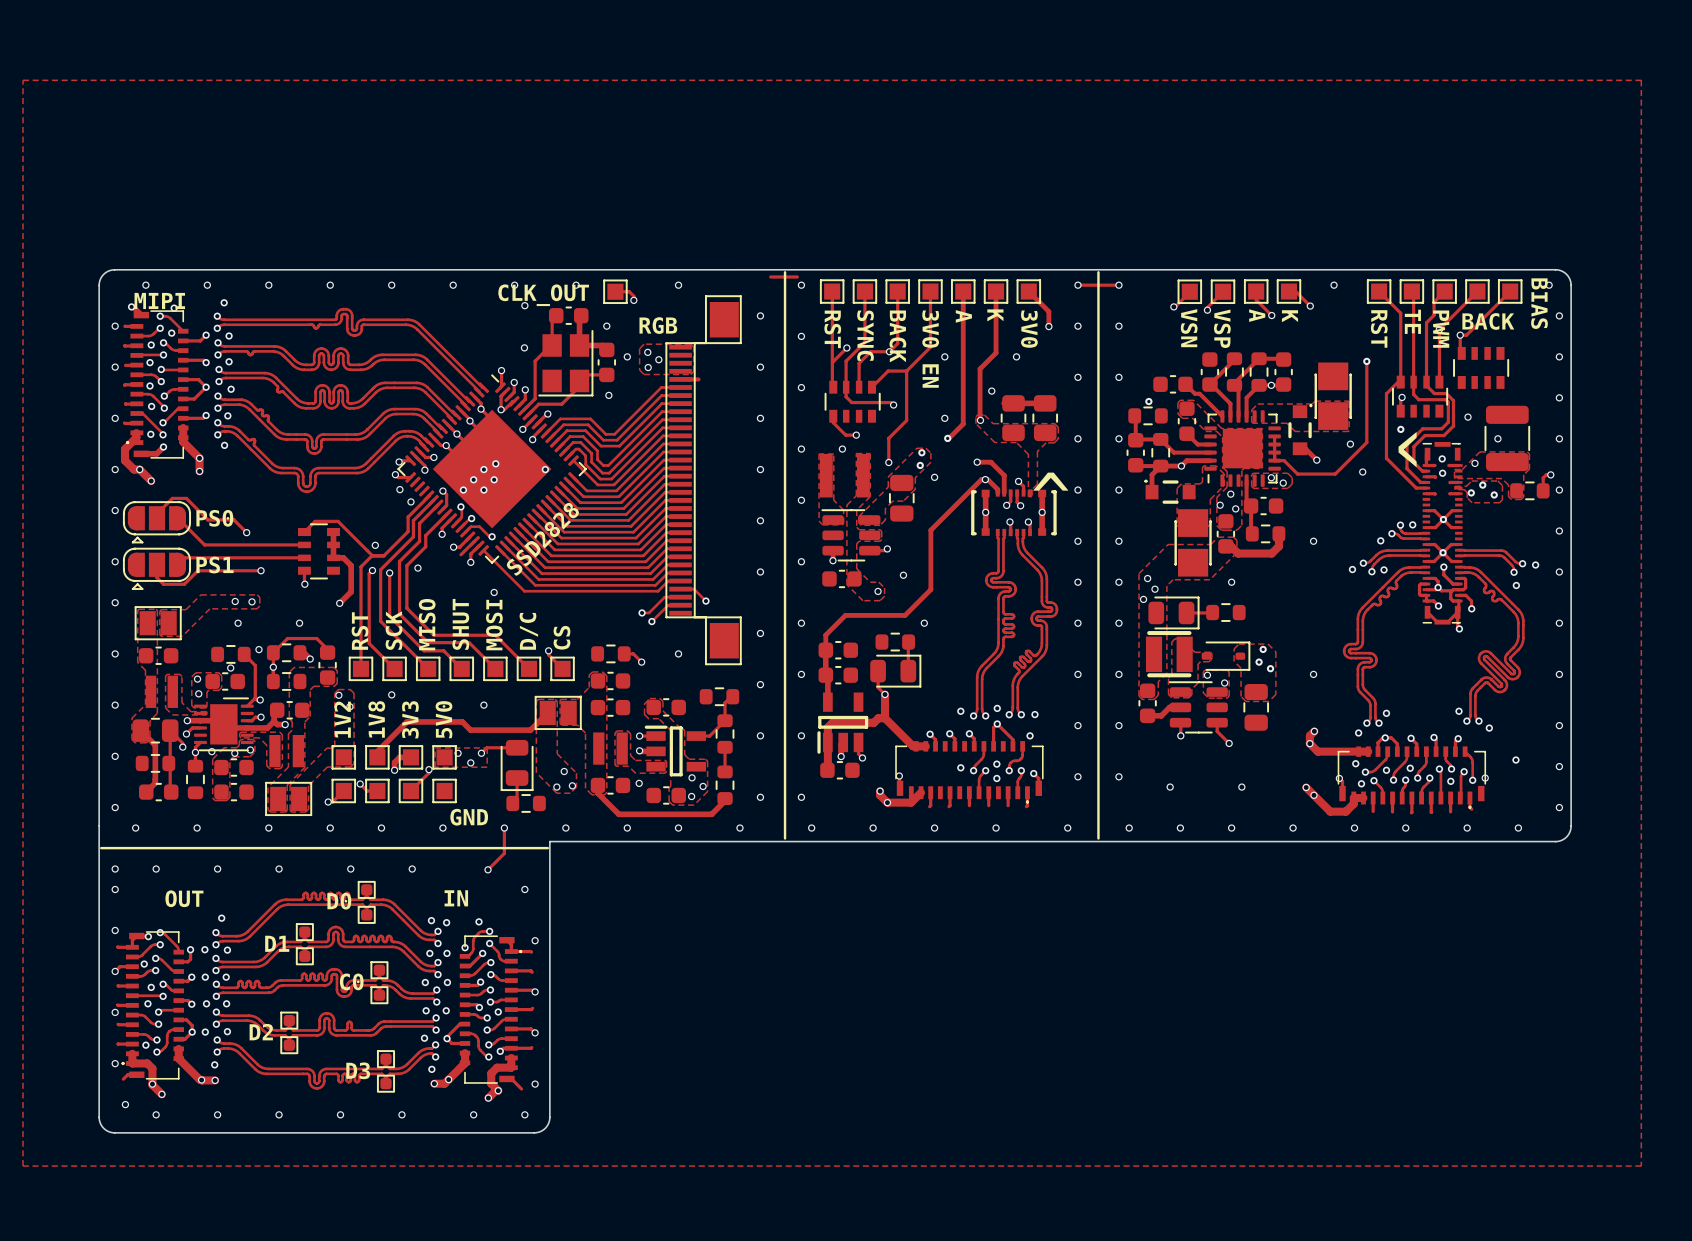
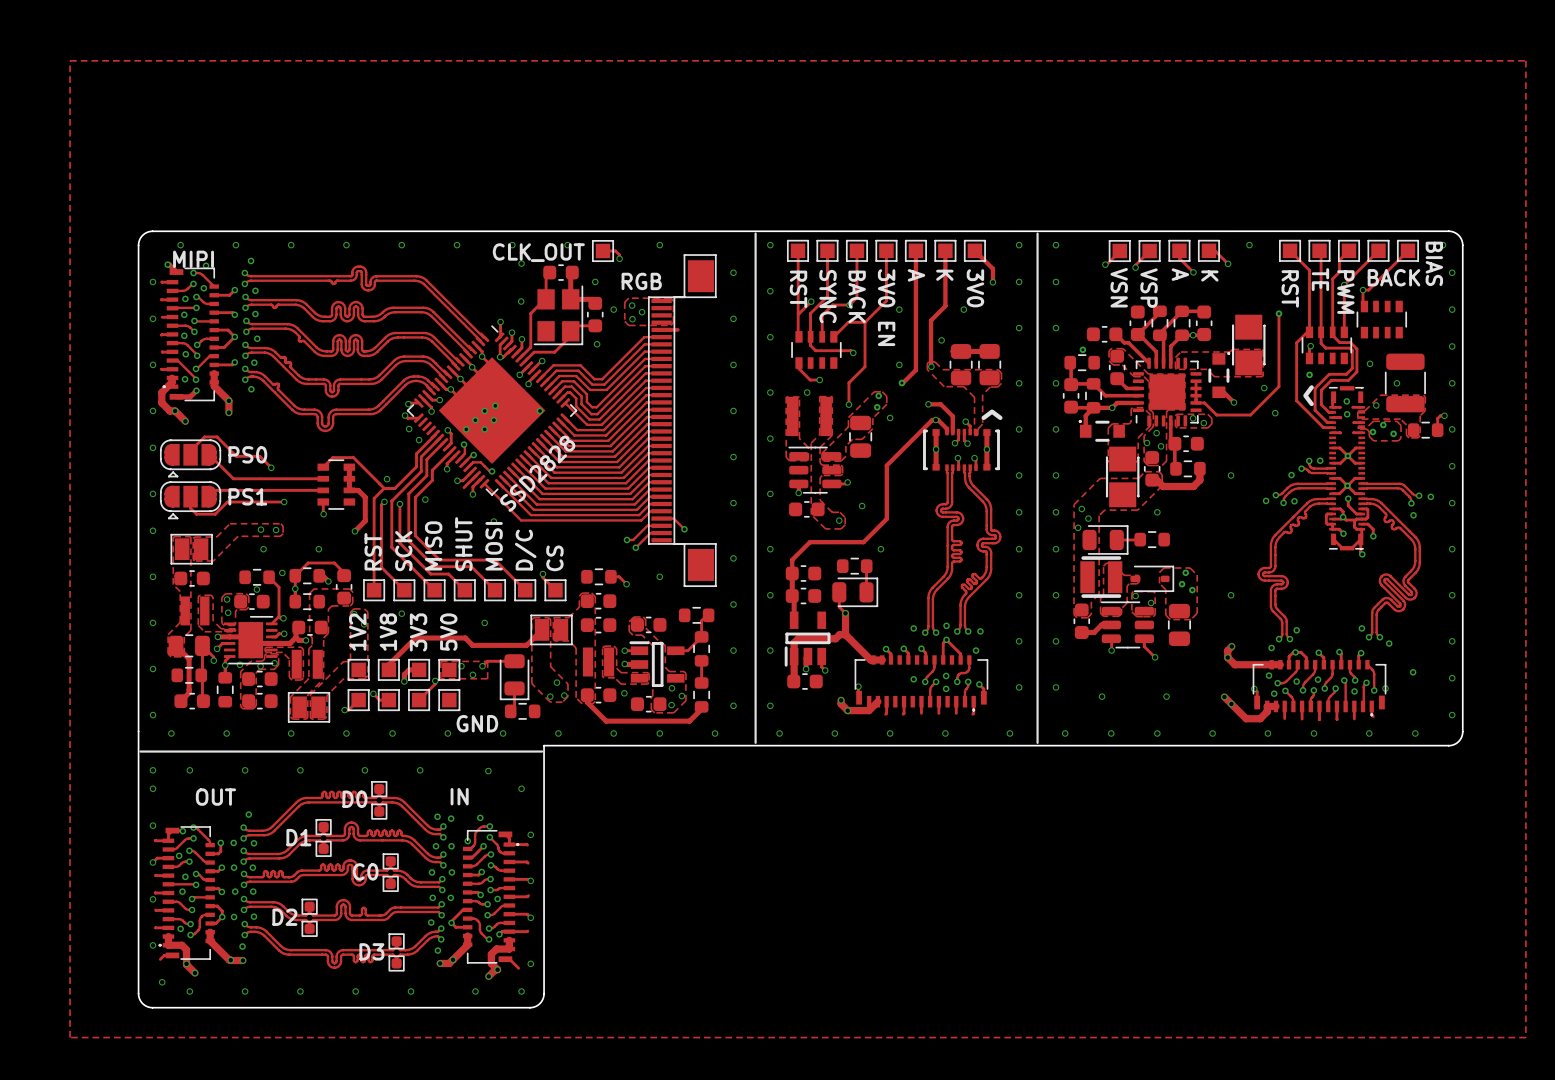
track: (770, 276) (797, 276) -> none
track: (1077, 285) (1118, 285) -> none
track: (504, 828) (504, 853) (488, 869) -> none

